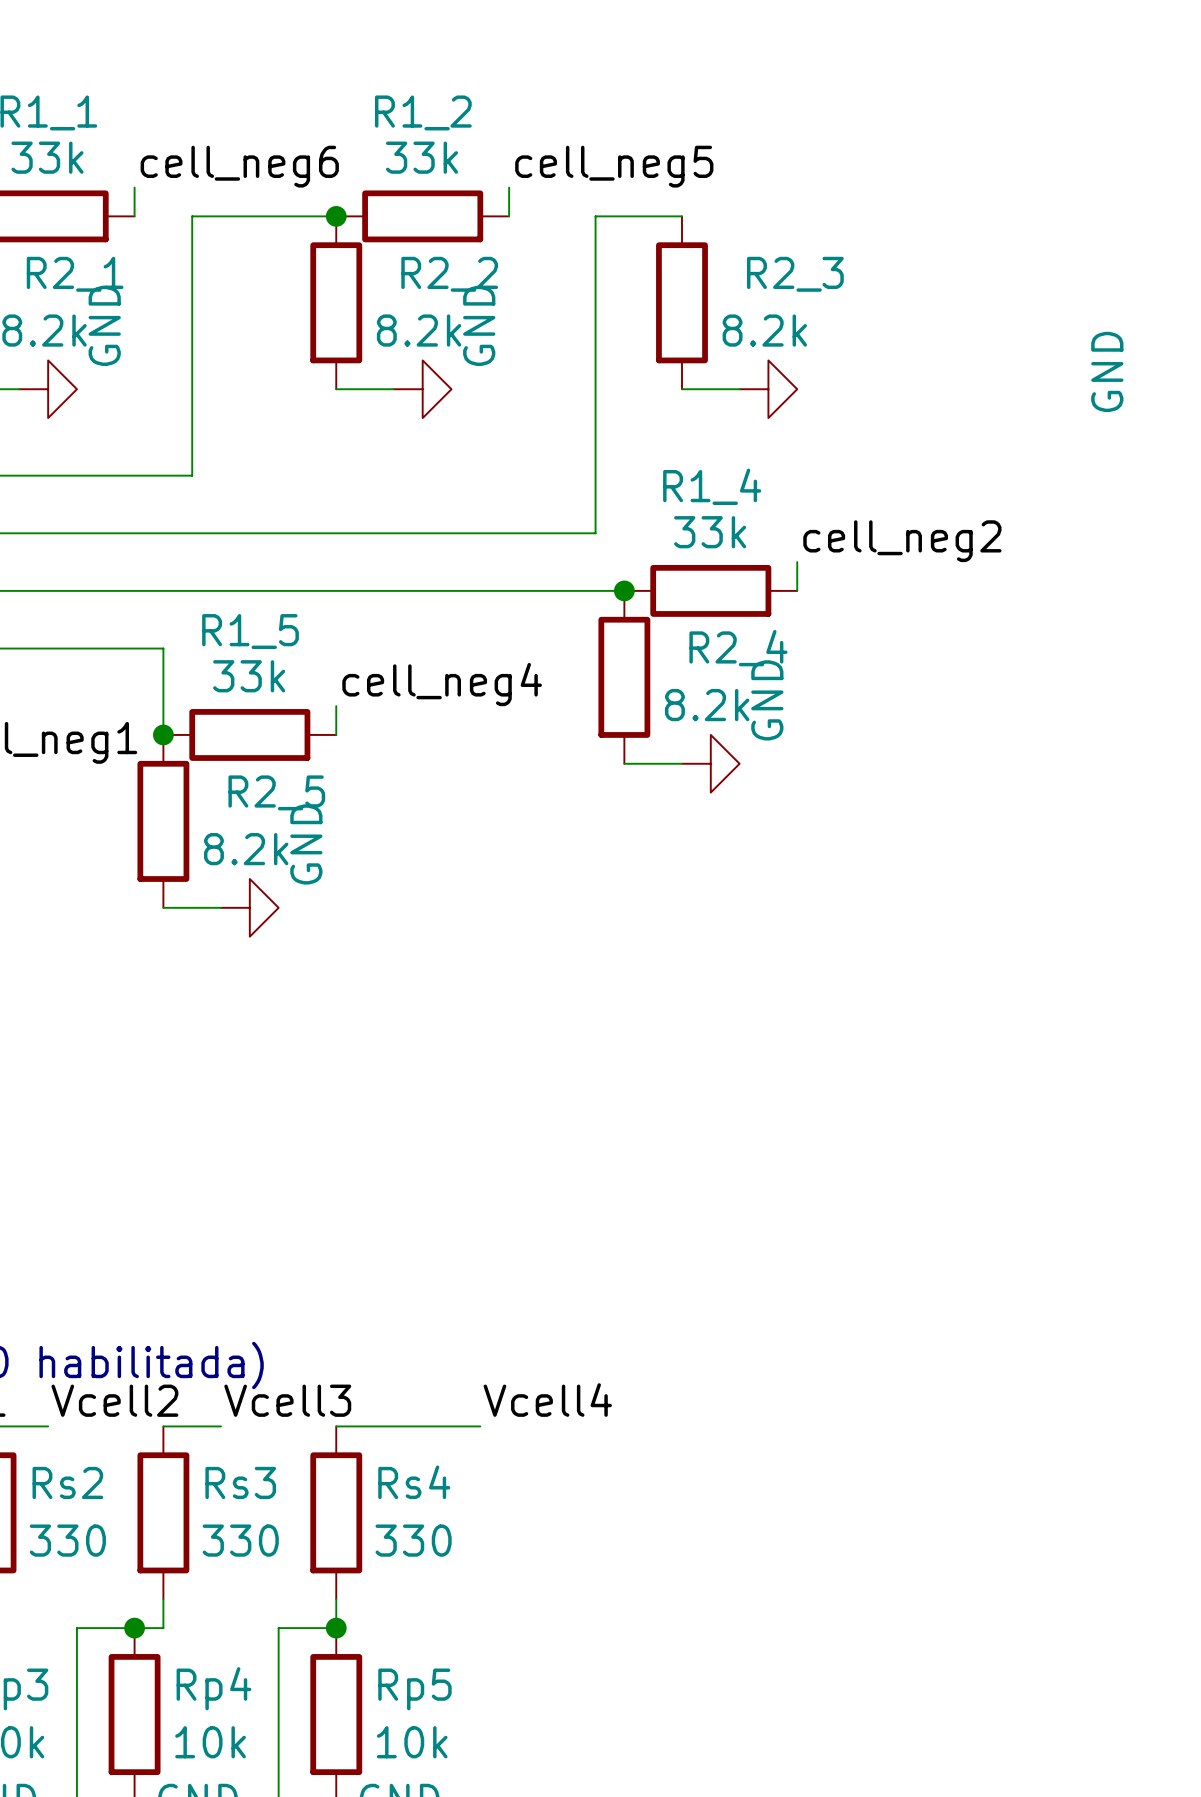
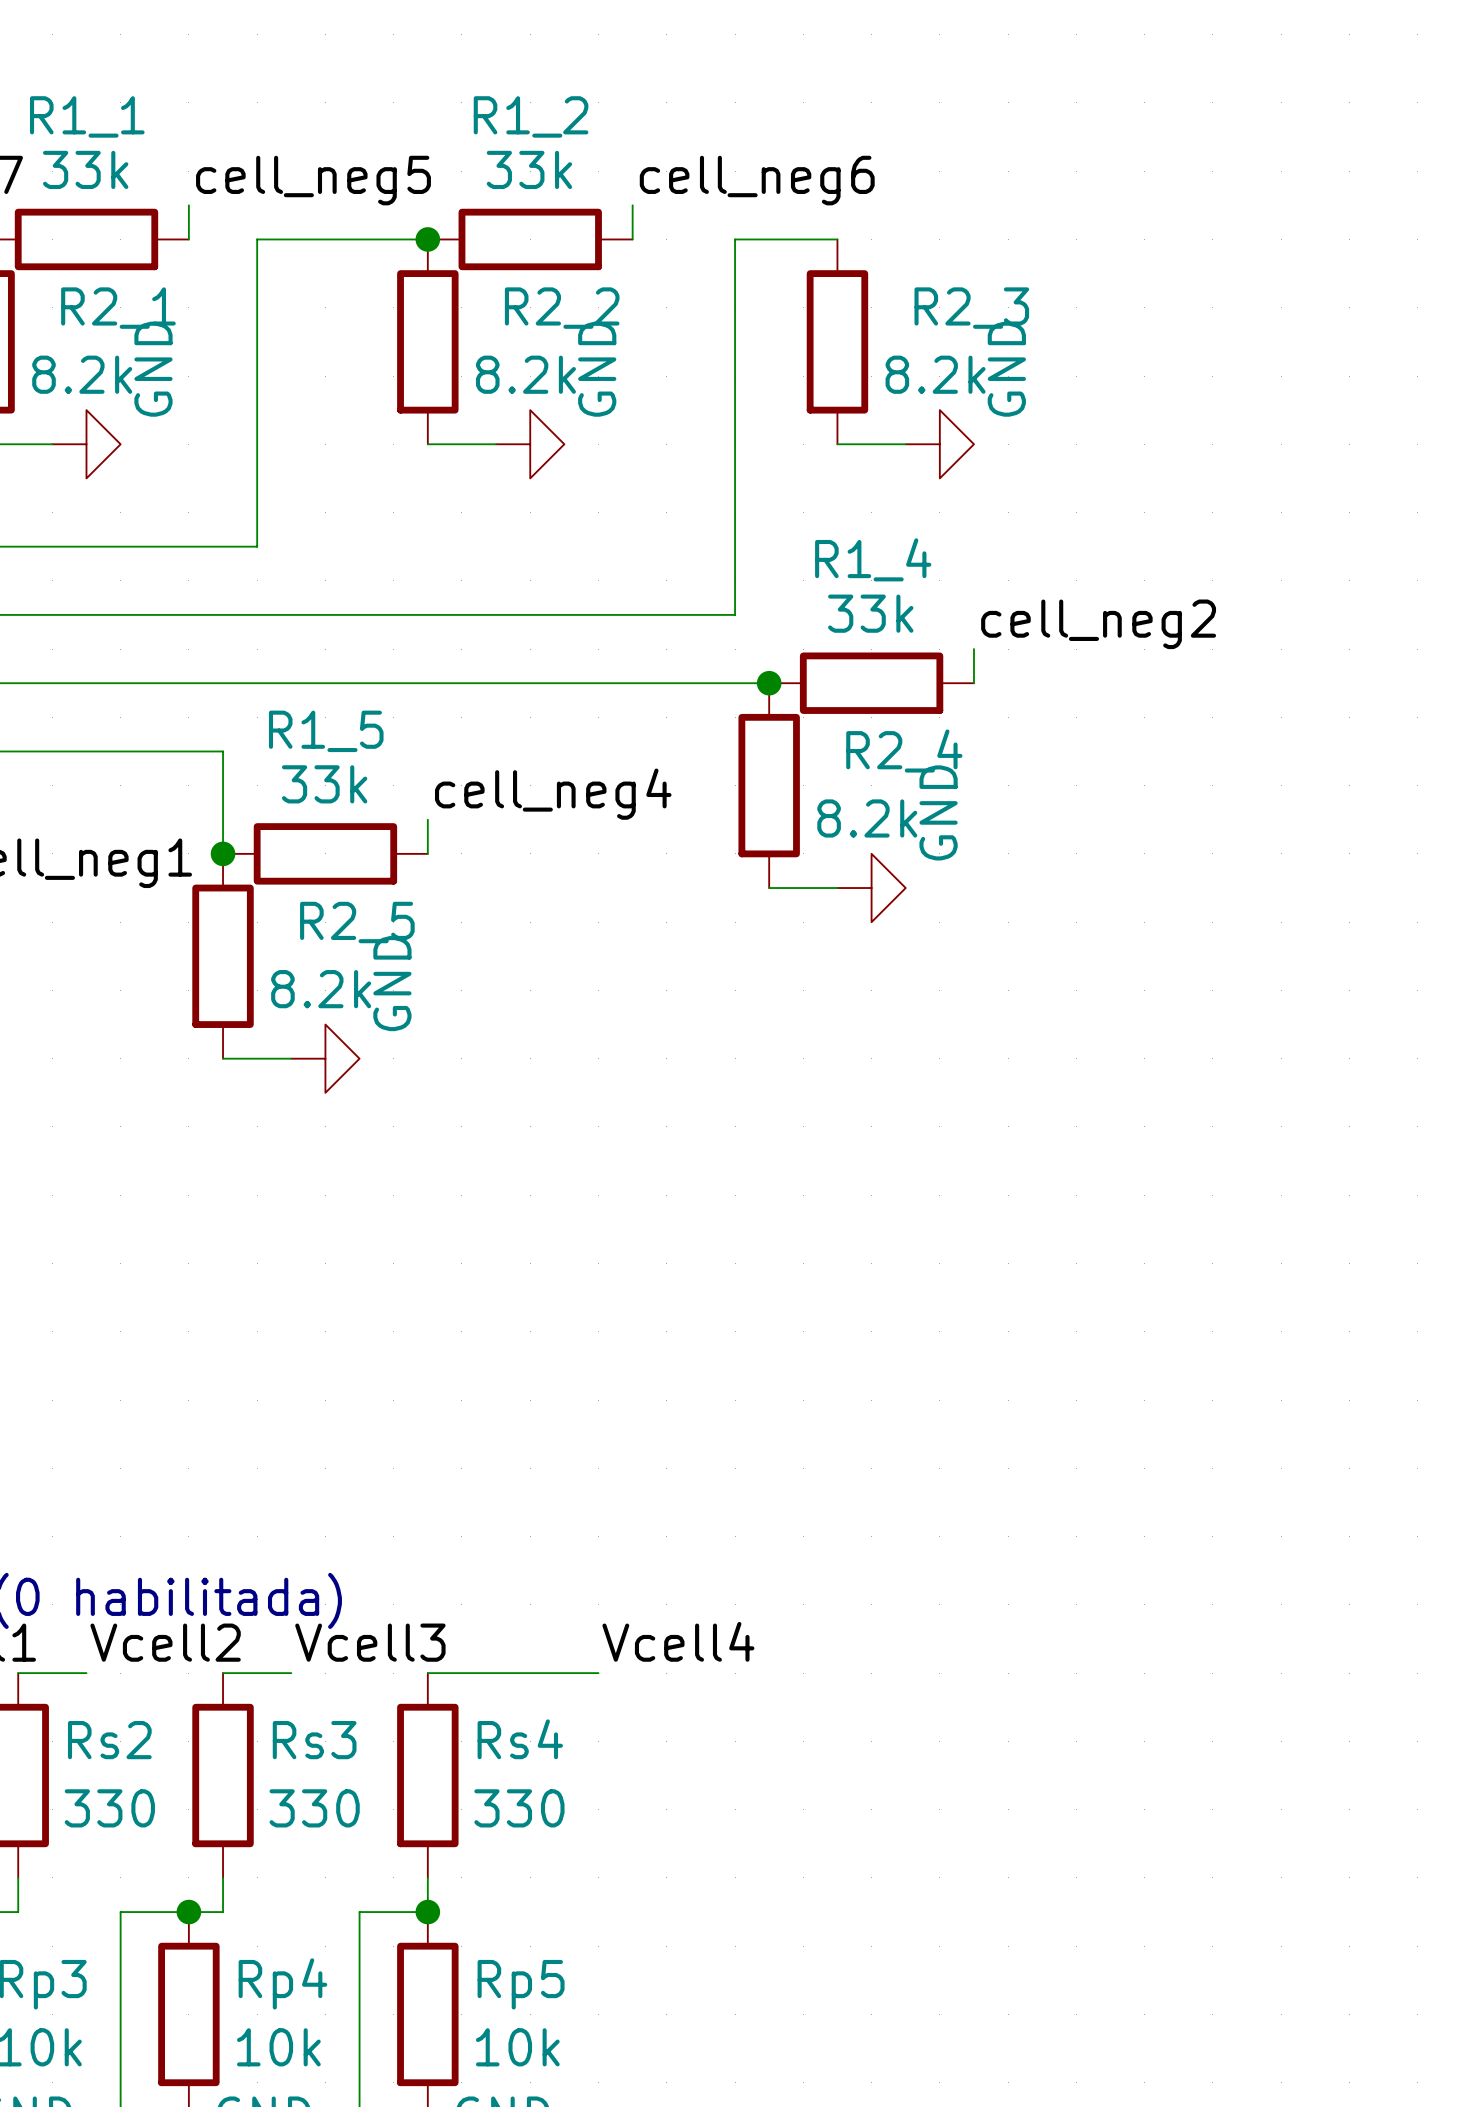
label: cell_neg6 (239, 166) -> cell_neg5 (313, 180)
label: cell_neg5 (614, 166) -> cell_neg6 (757, 180)
power symbol text position: GND (1107, 371) -> GND (1006, 369)

